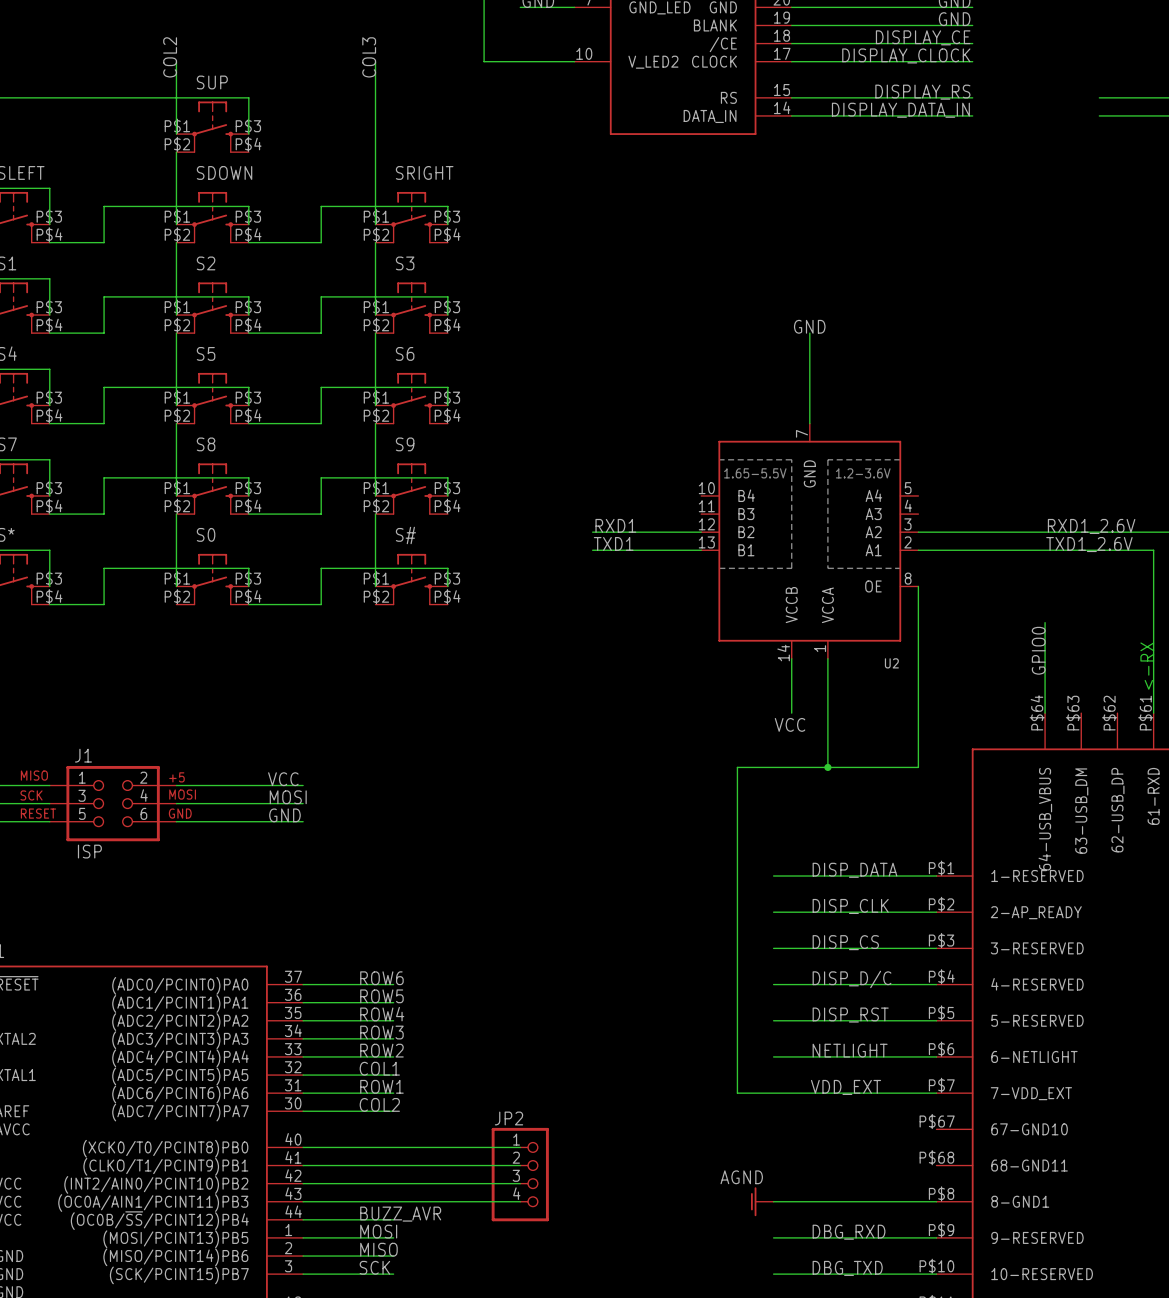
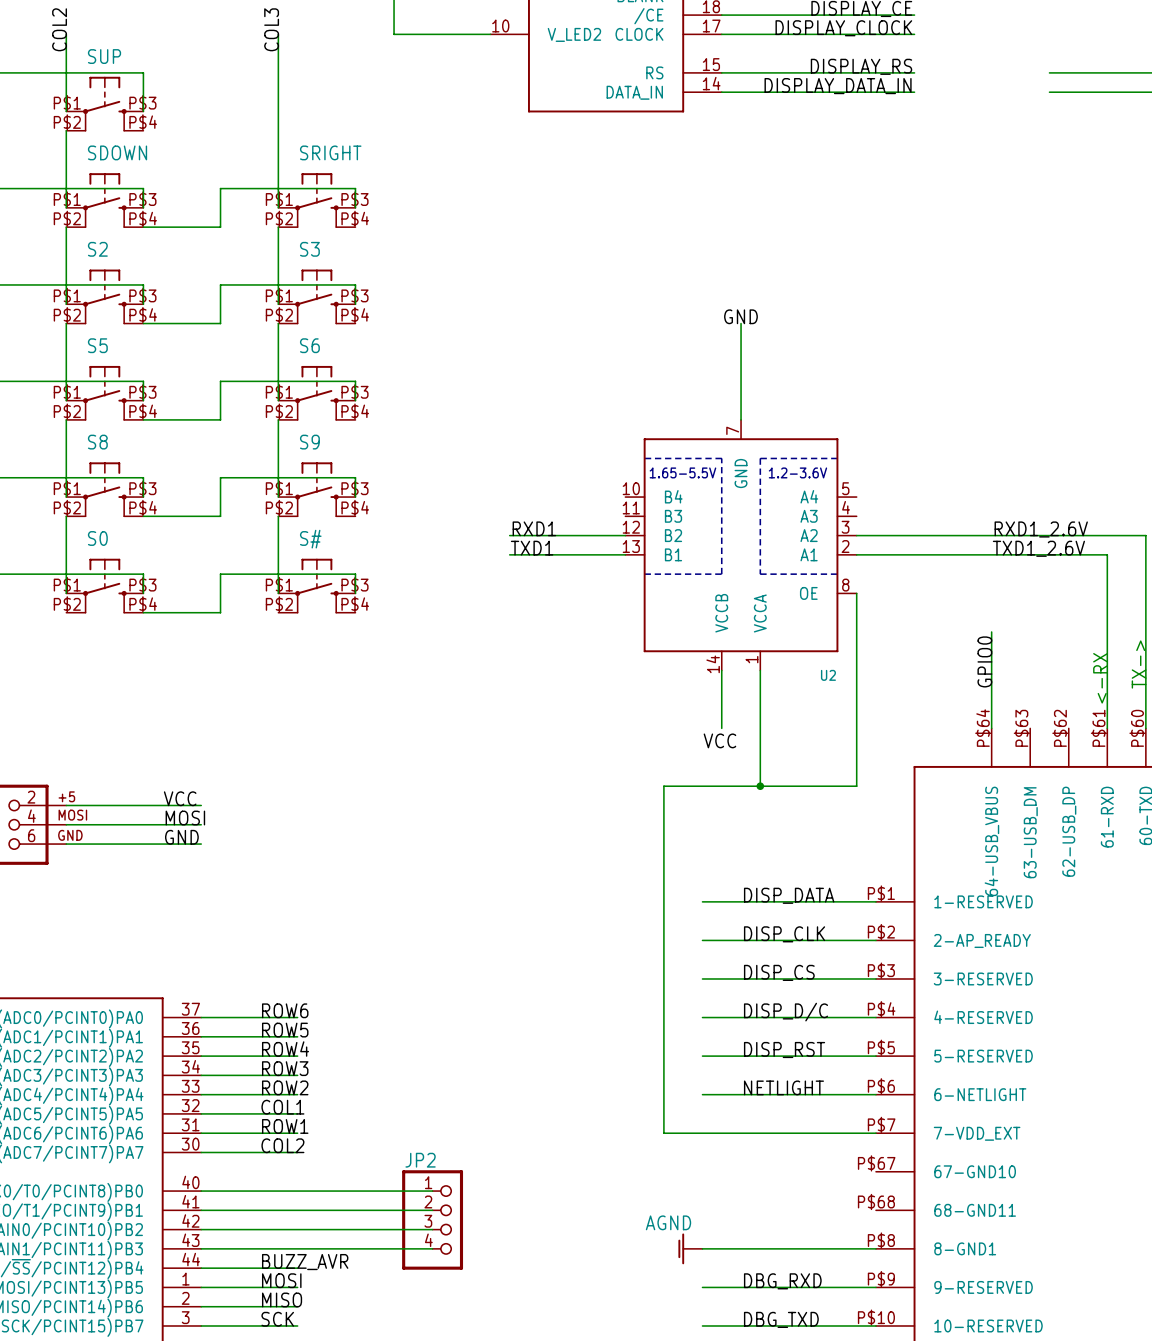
label: VDD_EXT (846, 1087) -> none

